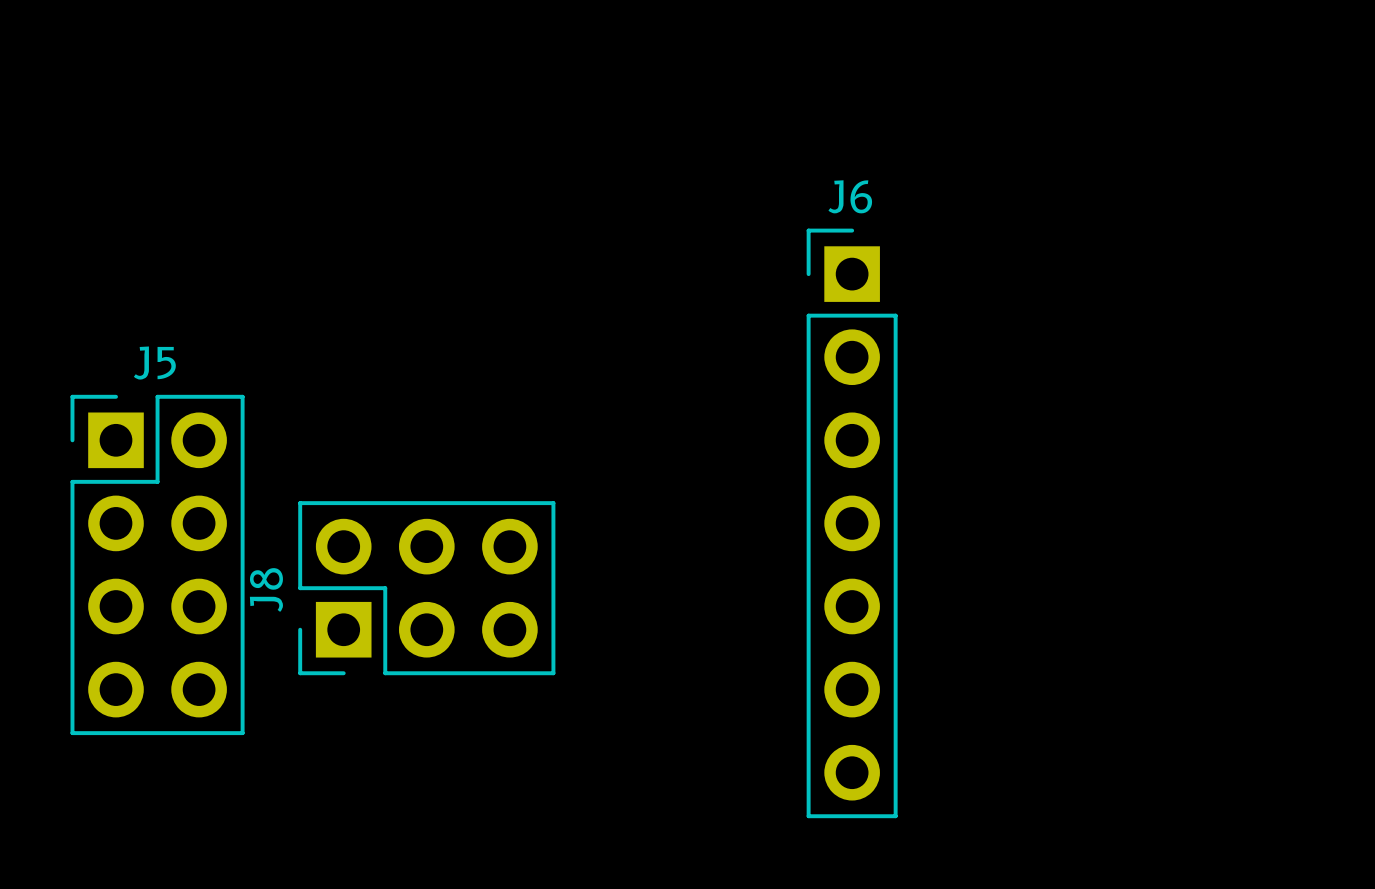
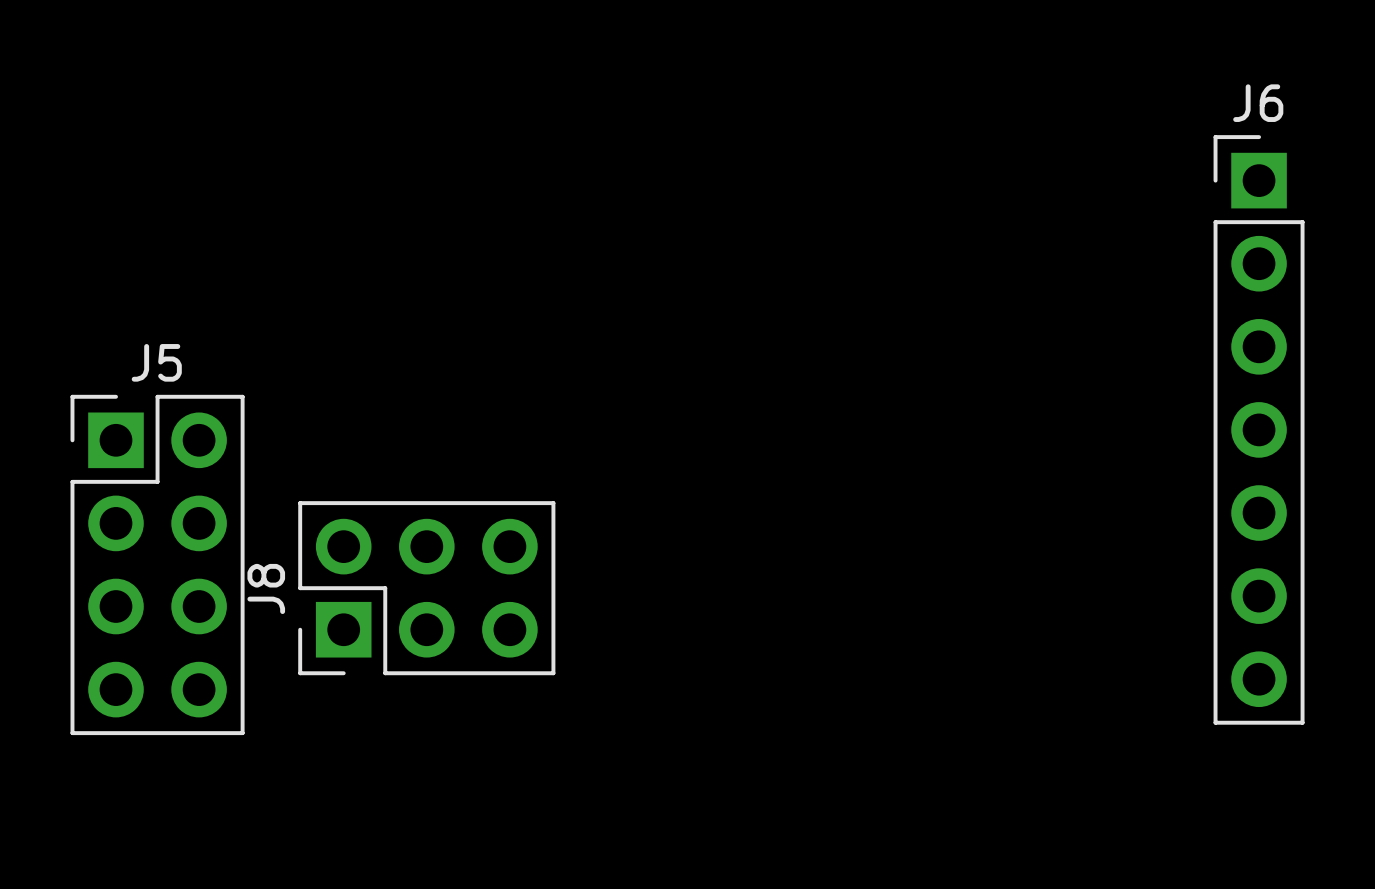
J6 position: (852, 523) -> (1259, 429)

